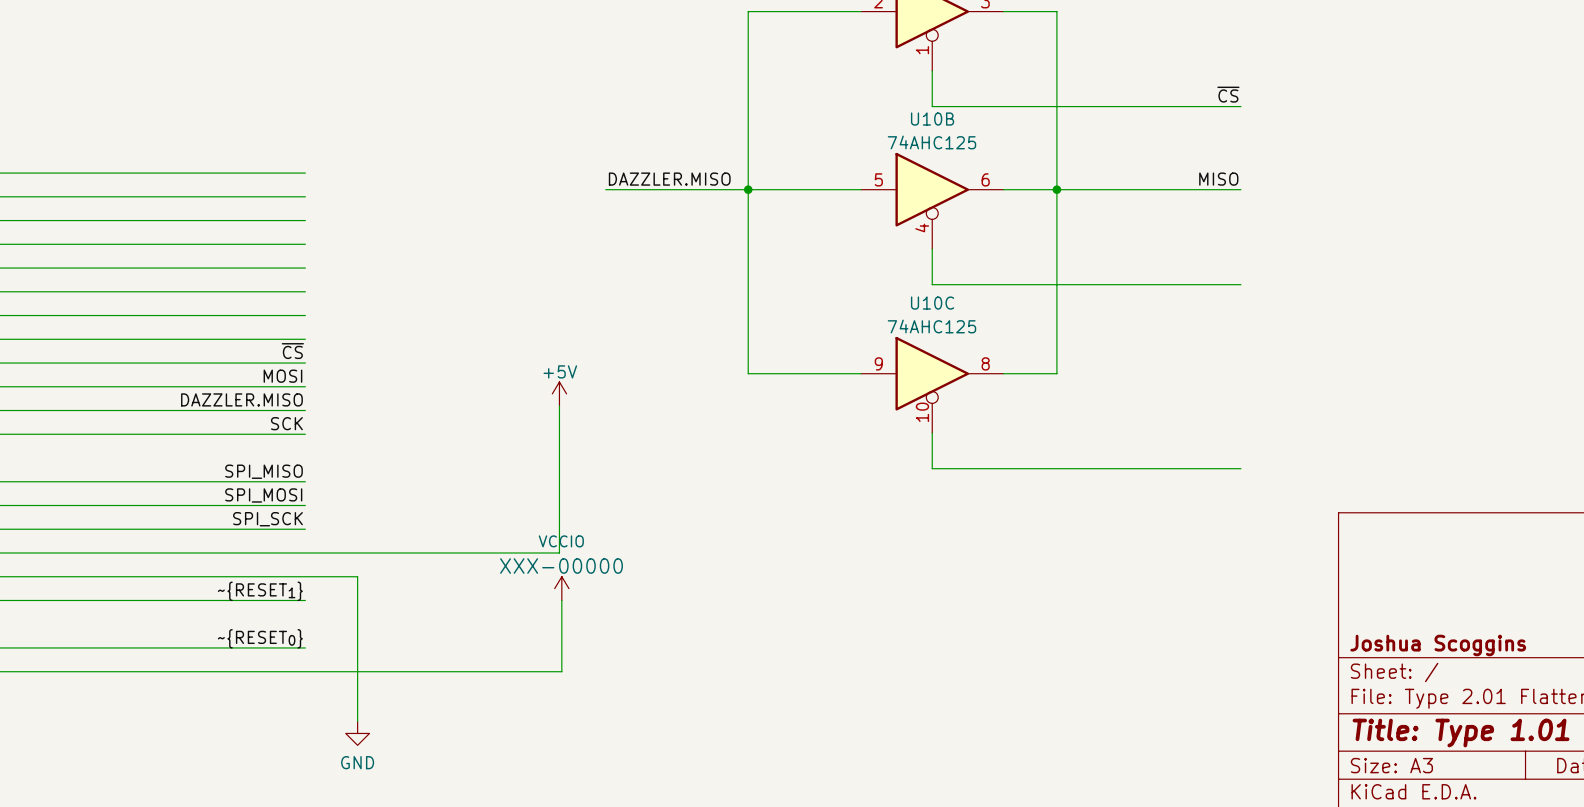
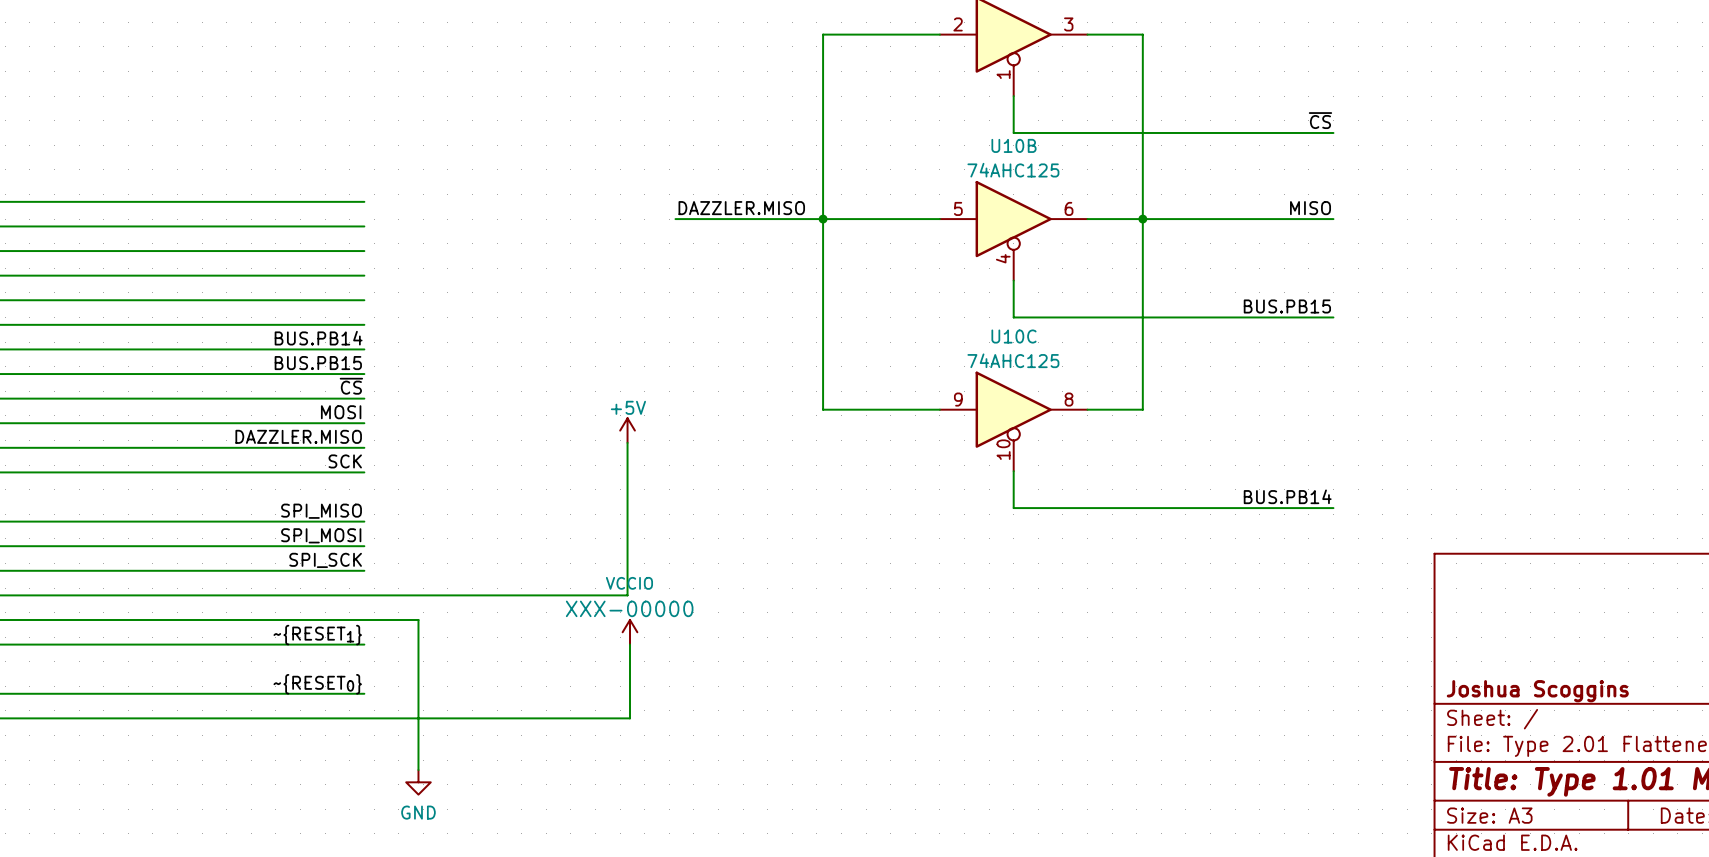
label: none -> BUS.PB15 (1287, 306)
label: none -> BUS.PB14 (318, 338)
label: none -> BUS.PB15 (318, 363)
label: none -> BUS.PB14 (1287, 496)

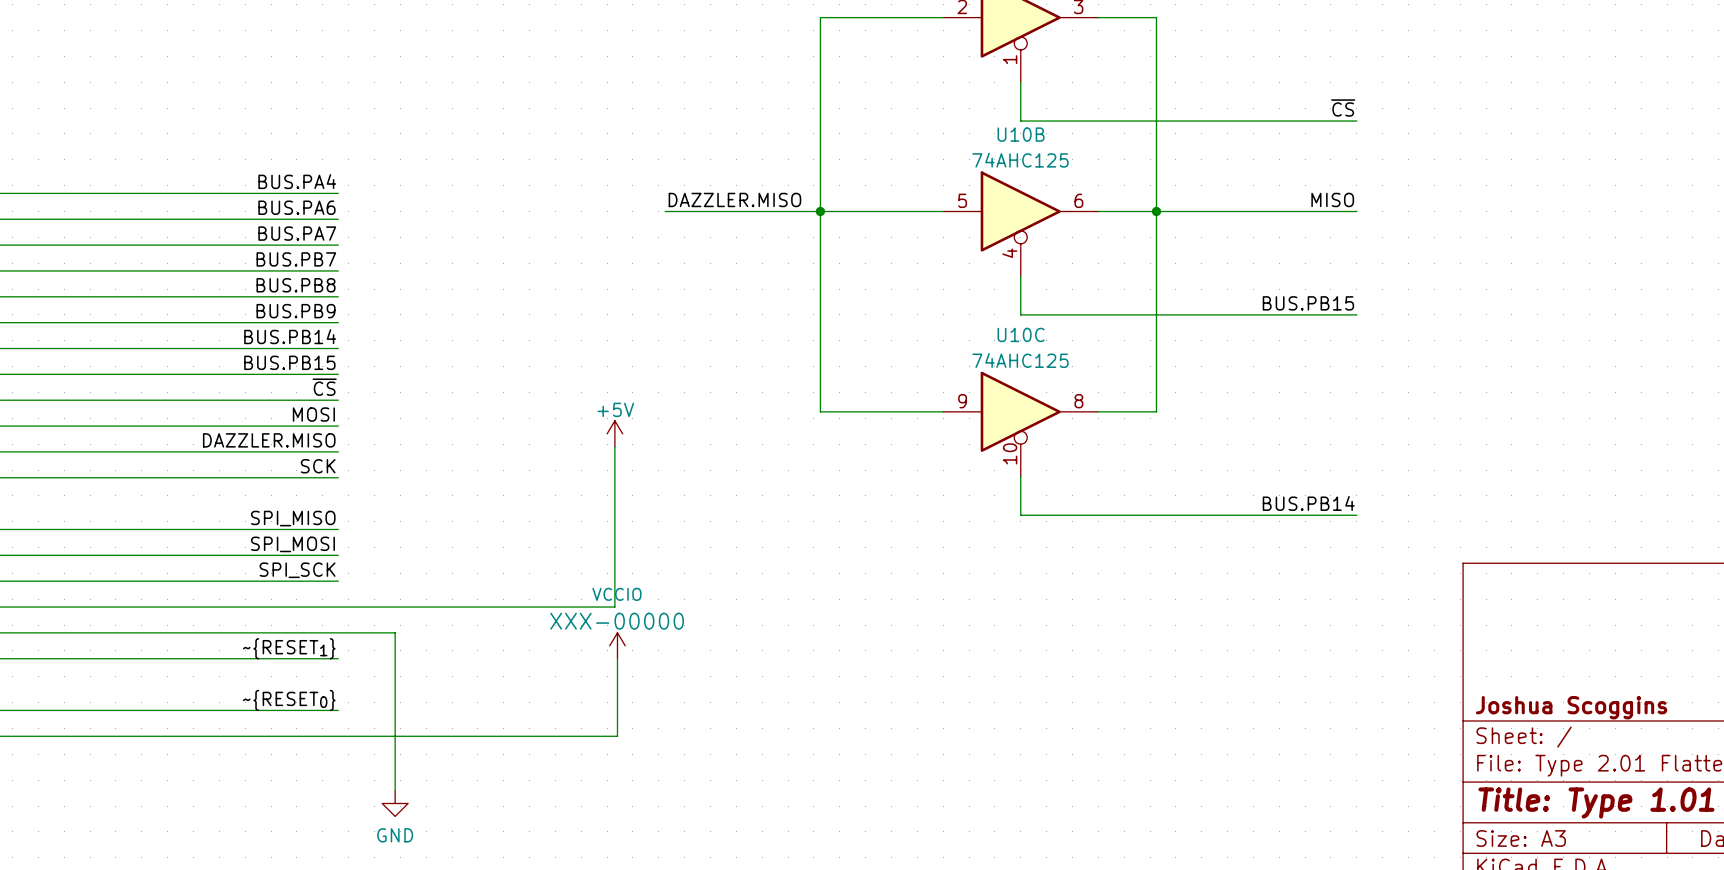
label: none -> BUS.PA4 (297, 181)
label: none -> BUS.PA6 (296, 207)
label: none -> BUS.PA7 (297, 233)
label: none -> BUS.PB7 (296, 259)
label: none -> BUS.PB8 (296, 285)
label: none -> BUS.PB9 (296, 311)

